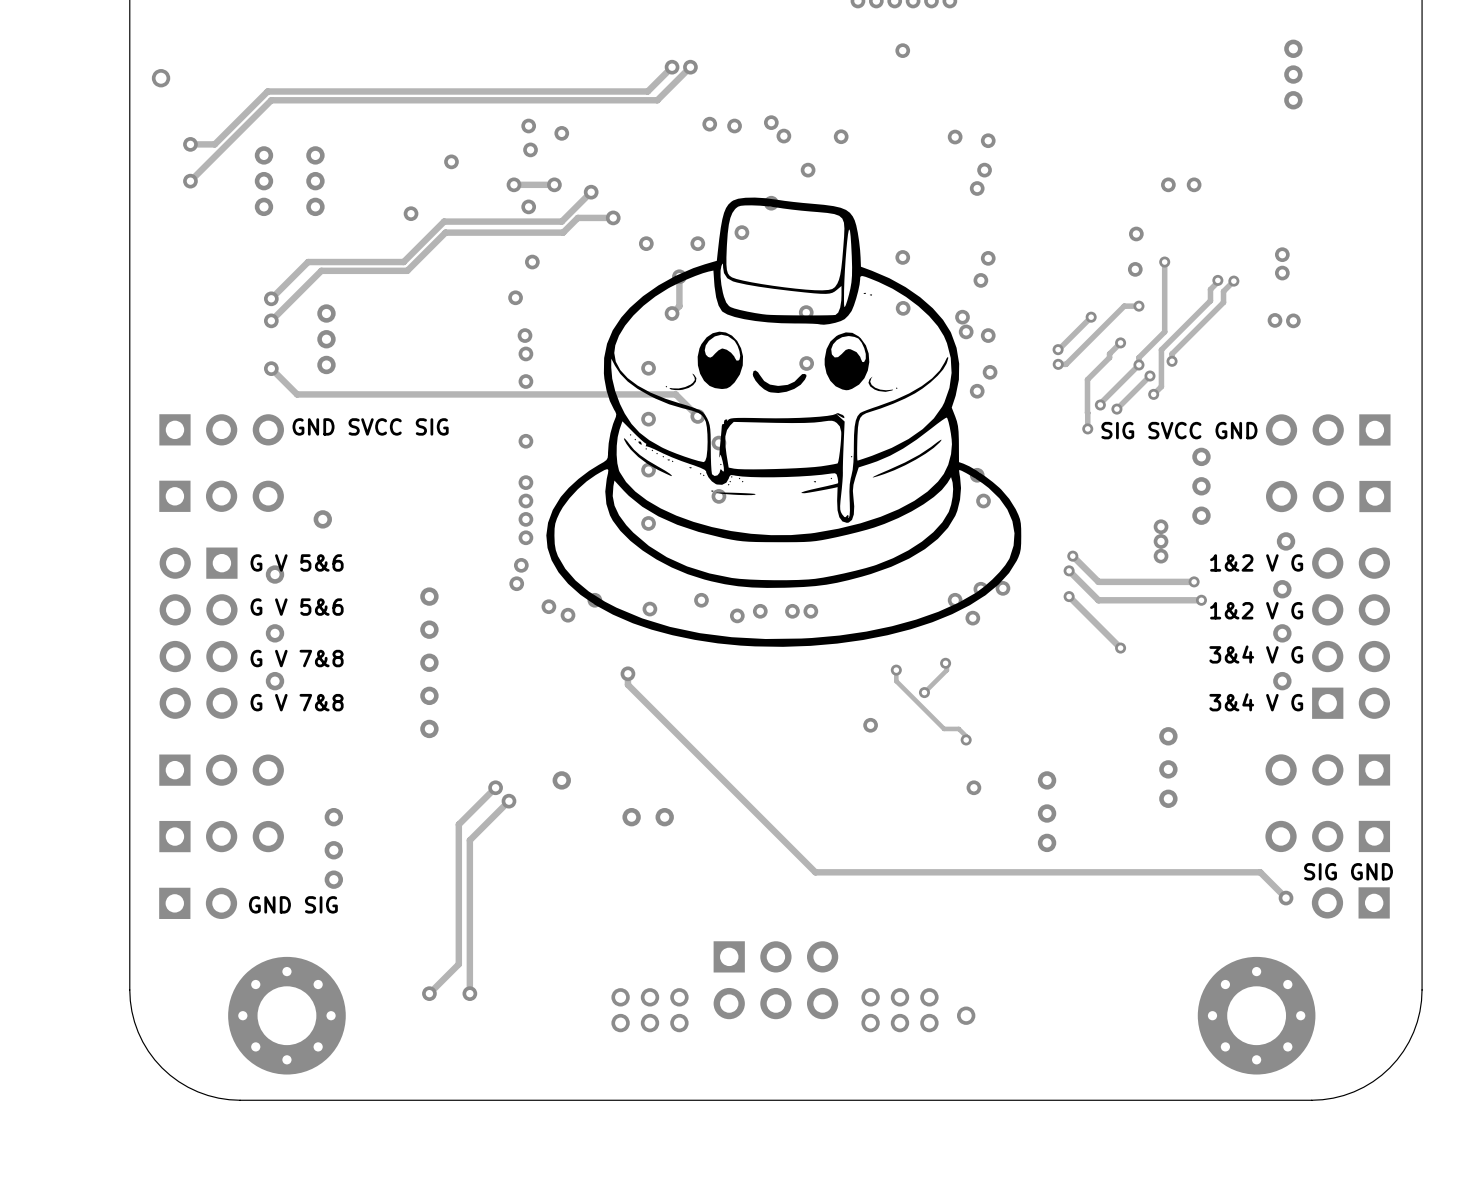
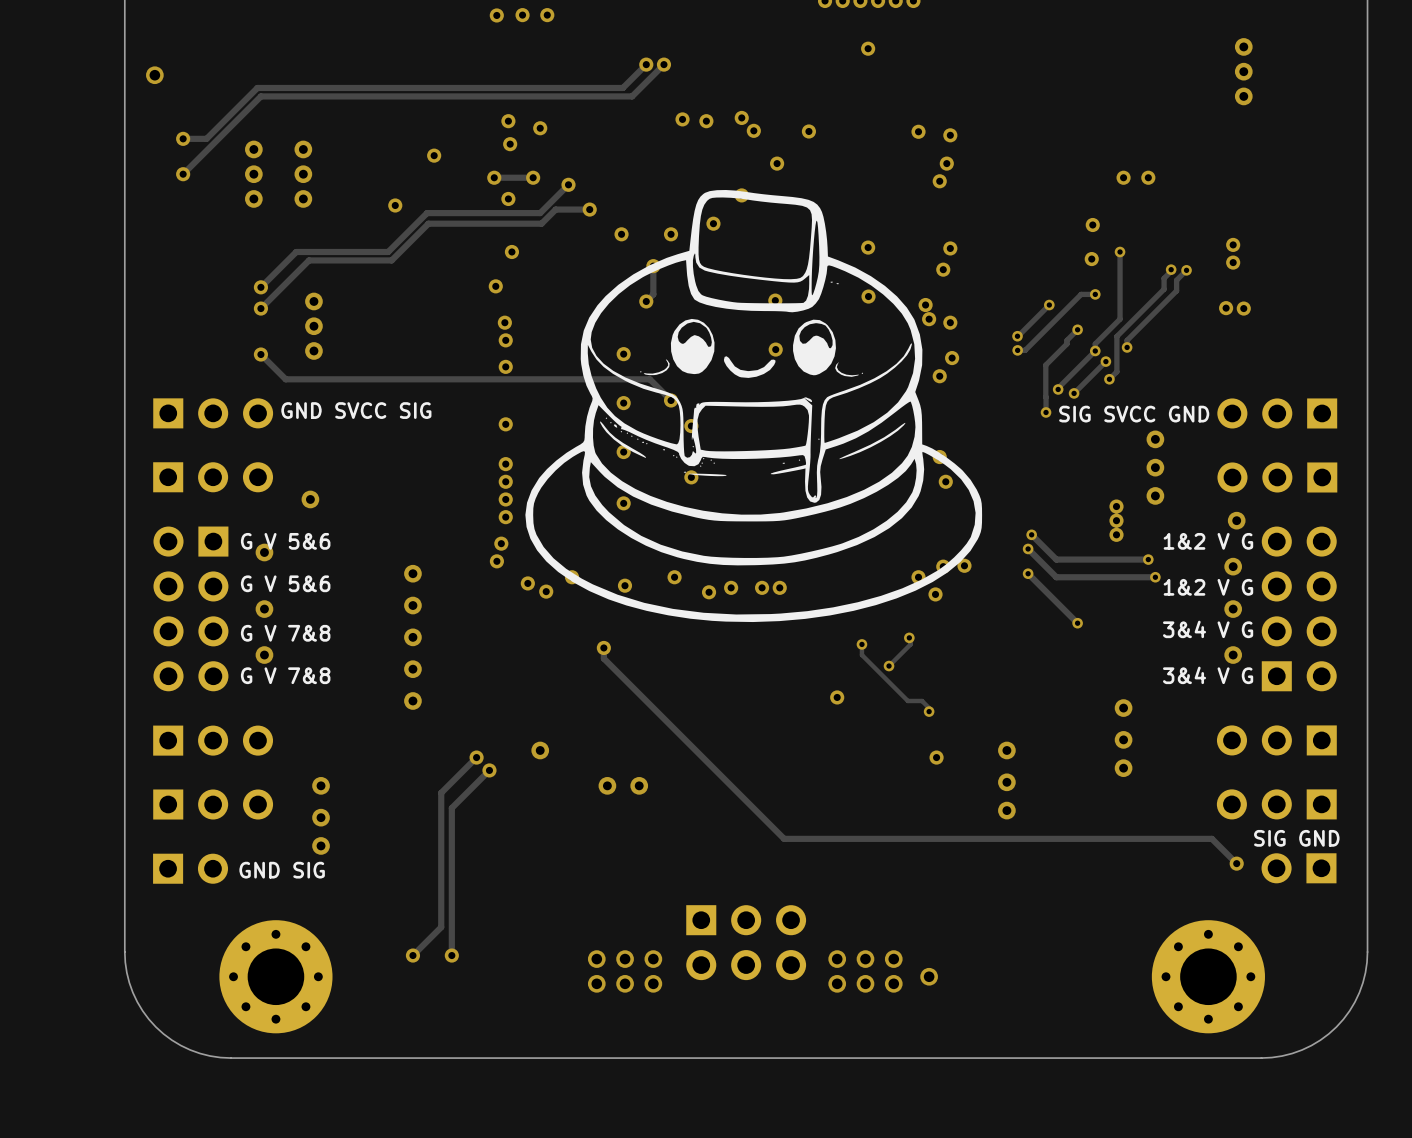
via: none -> (522, 15)
via: none -> (547, 15)
via: none -> (496, 15)

